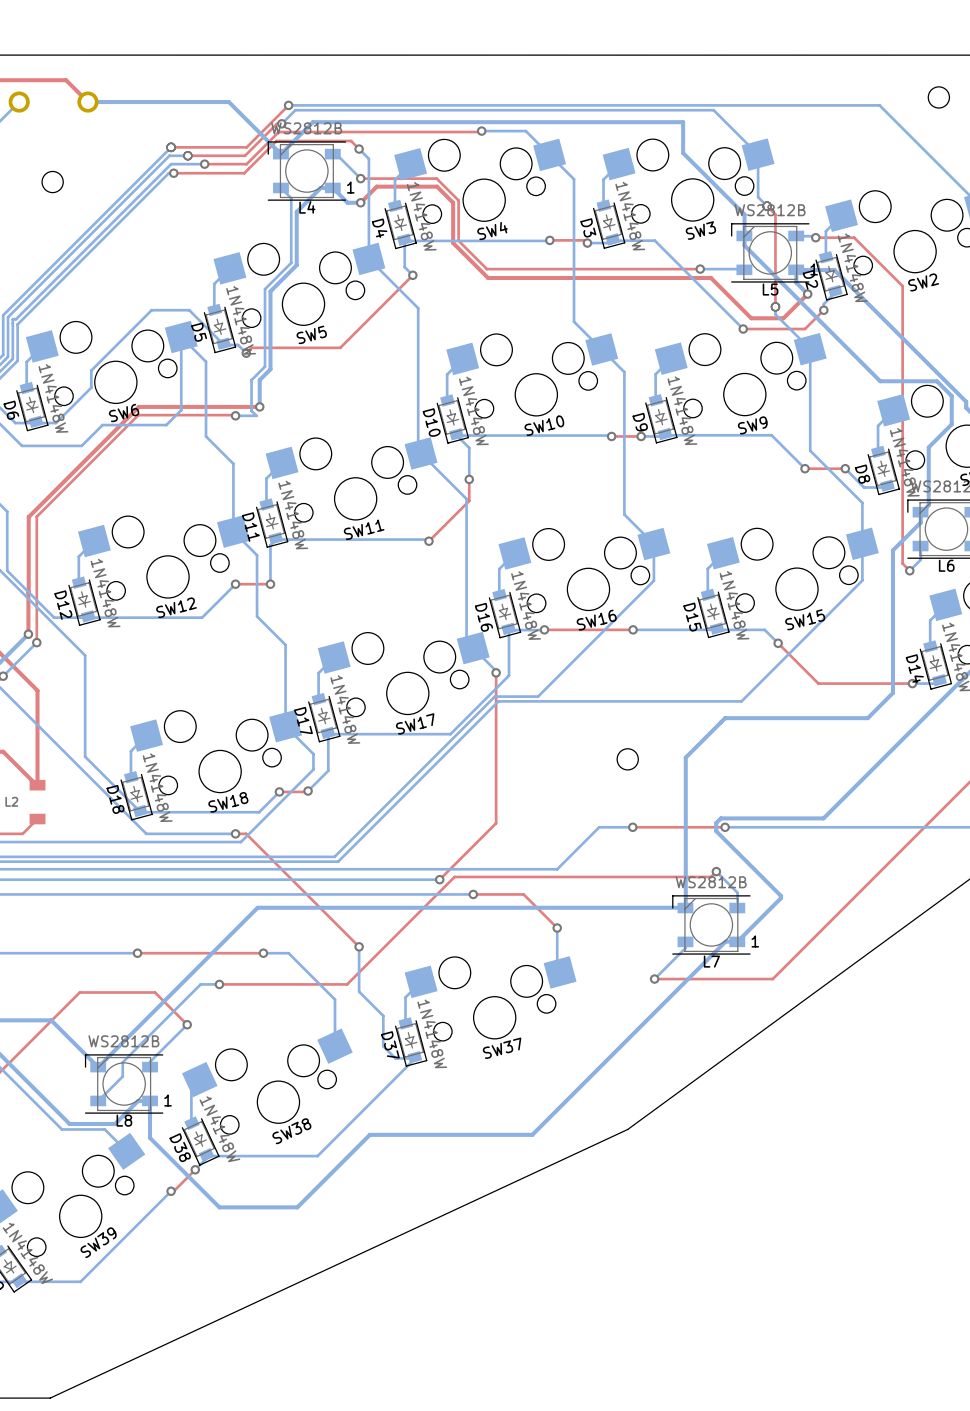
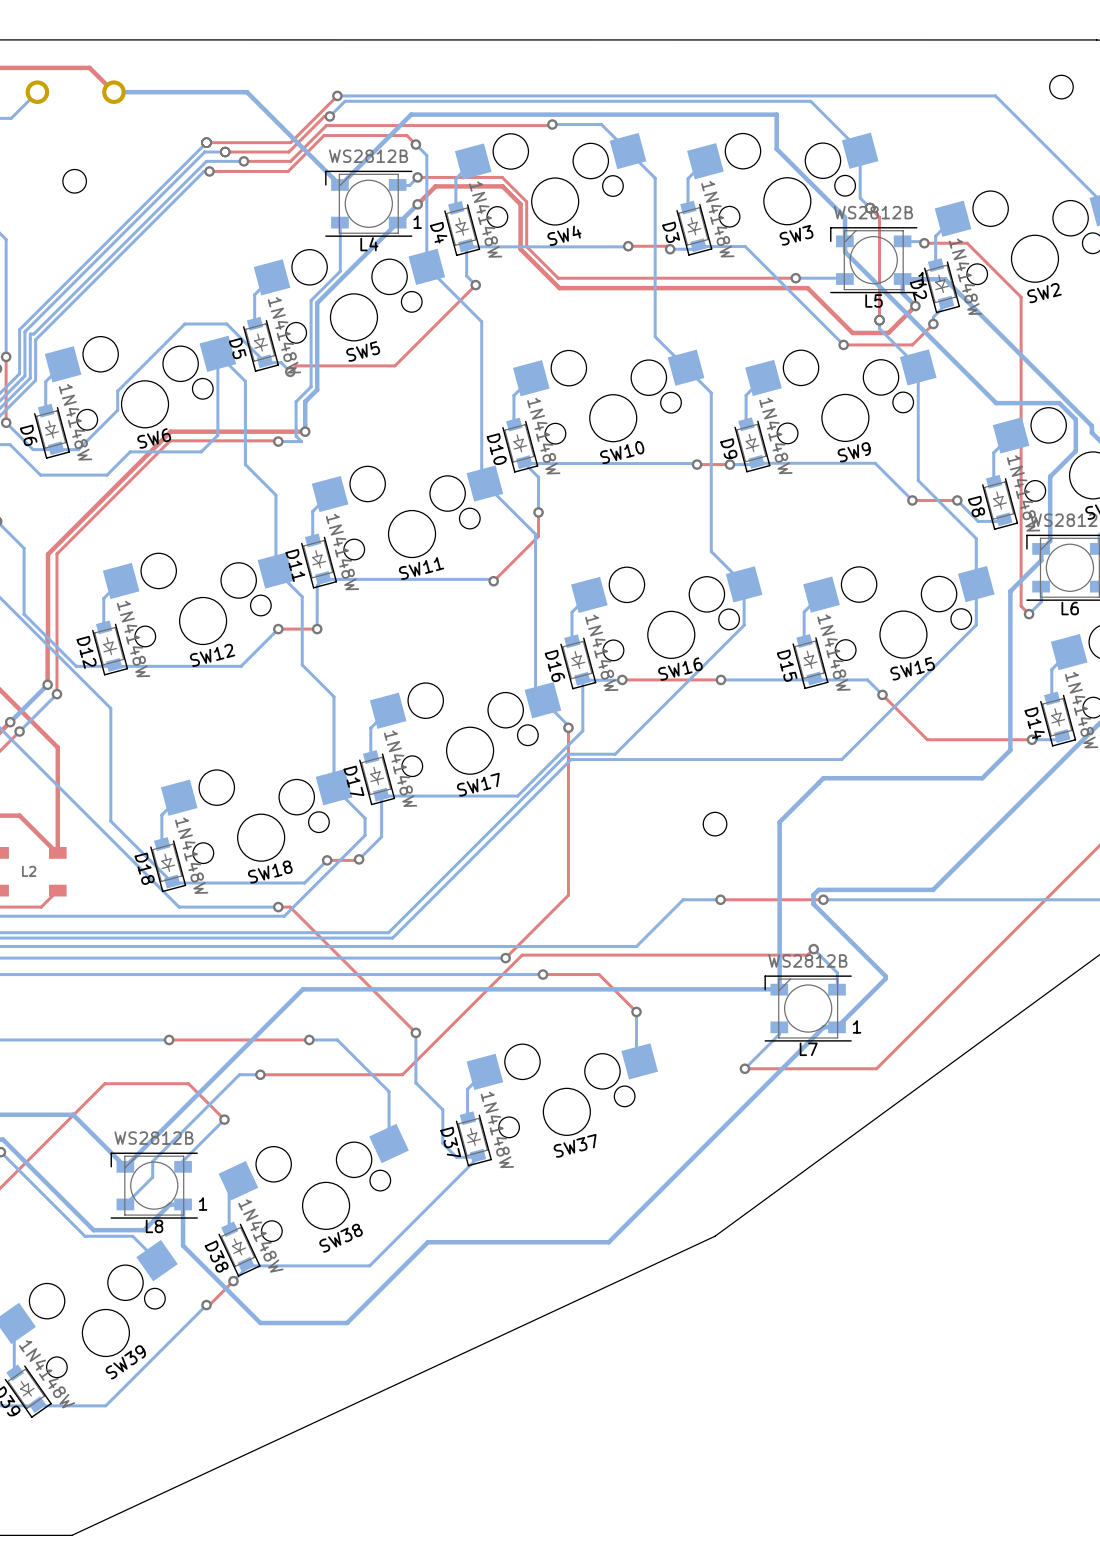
bottom track: (207, 102) (228, 102) (280, 154) (312, 122) (354, 122) -> (247, 92) (340, 185) (411, 114)
bottom track: (332, 154) (336, 154) (360, 178) -> (398, 185) (409, 185) (417, 177)
L4 position: (306, 171) -> (368, 203)
bottom track: (280, 187) (291, 198) (291, 219) -> none
bottom track: (360, 202) (347, 202) (332, 187) (320, 187) (296, 212) (296, 265) -> (417, 204) (346, 273)

